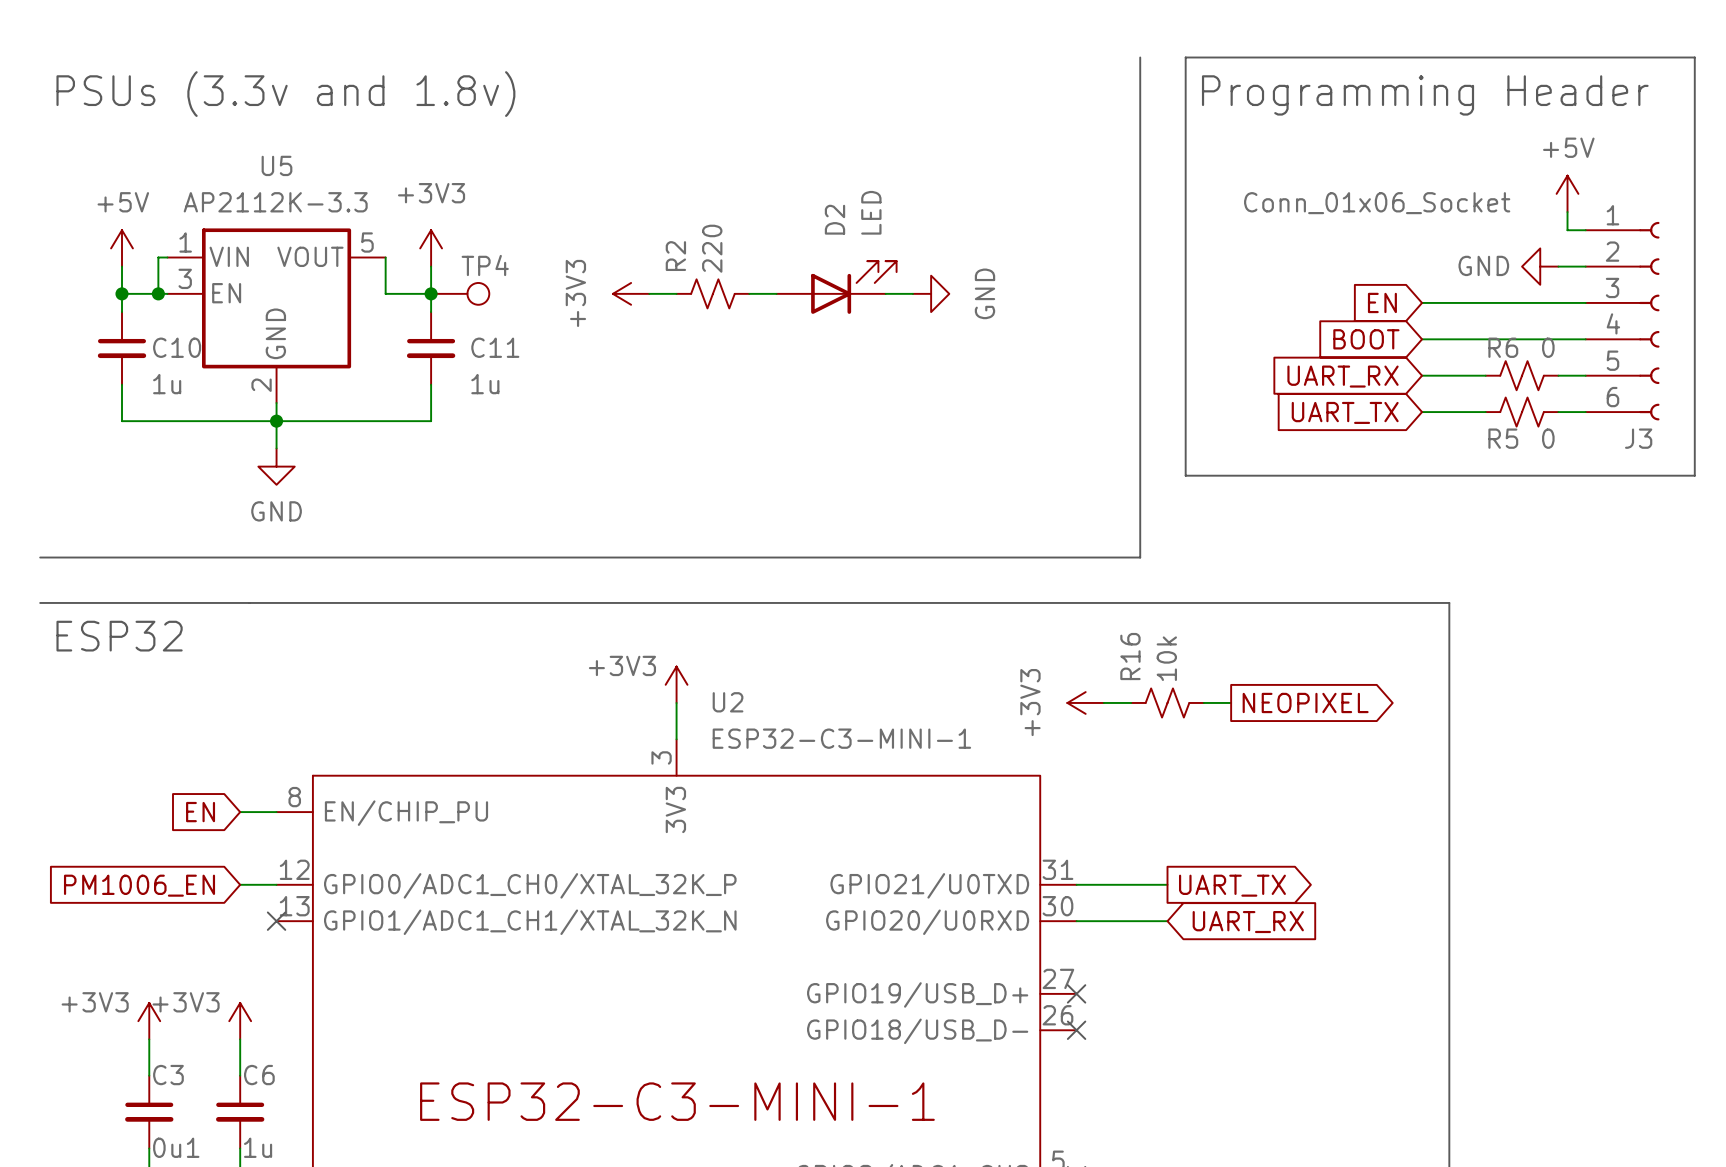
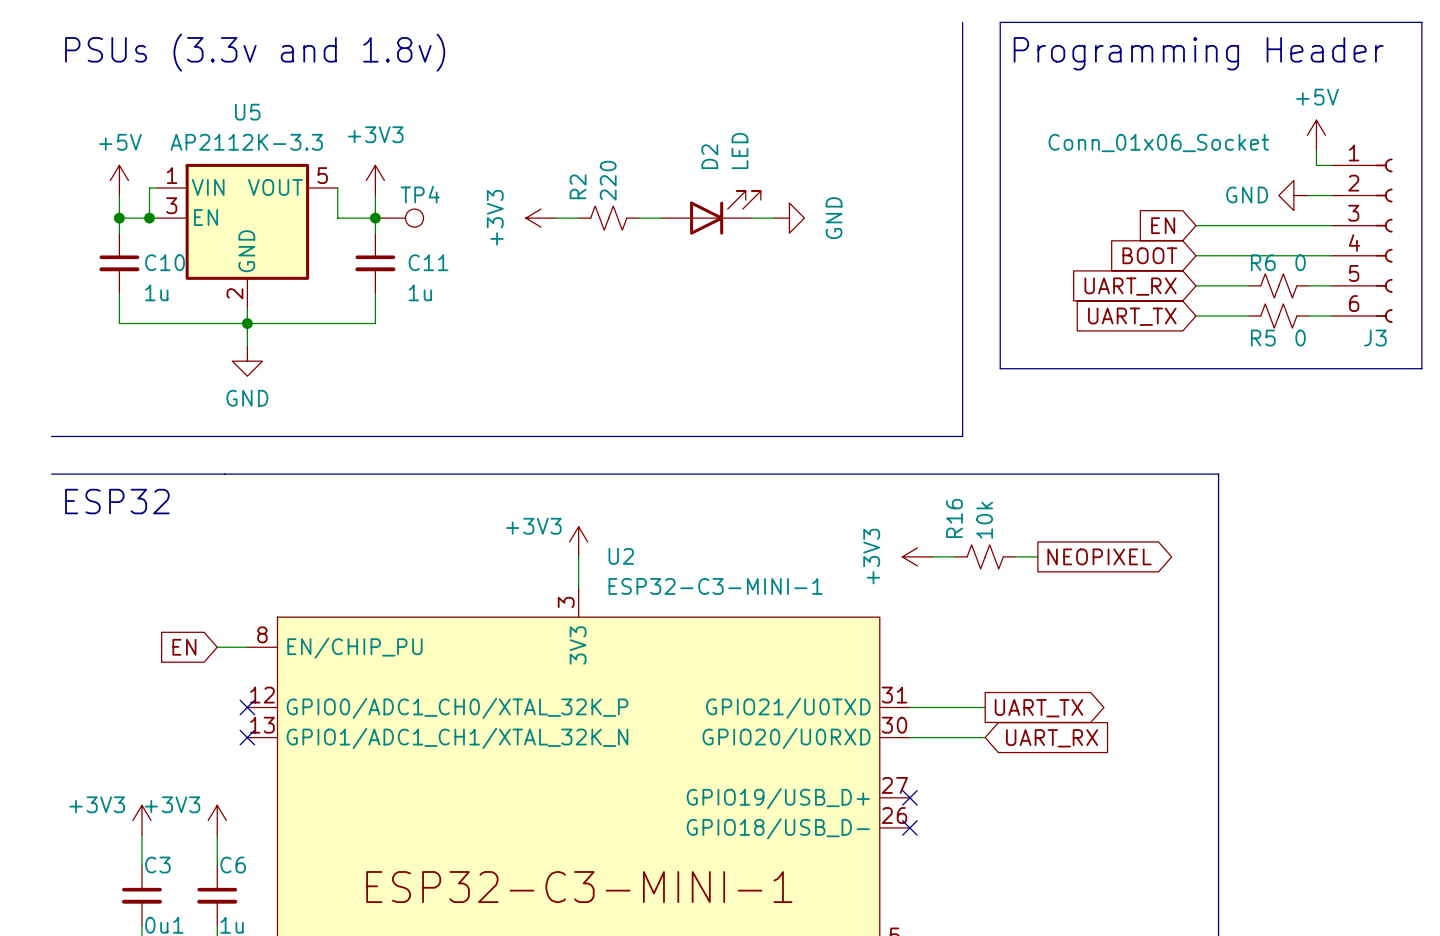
wire: (240, 884) (276, 884) -> none
no-connect mark: none -> (247, 707)
global label: PM1006_EN (139, 885) -> none

